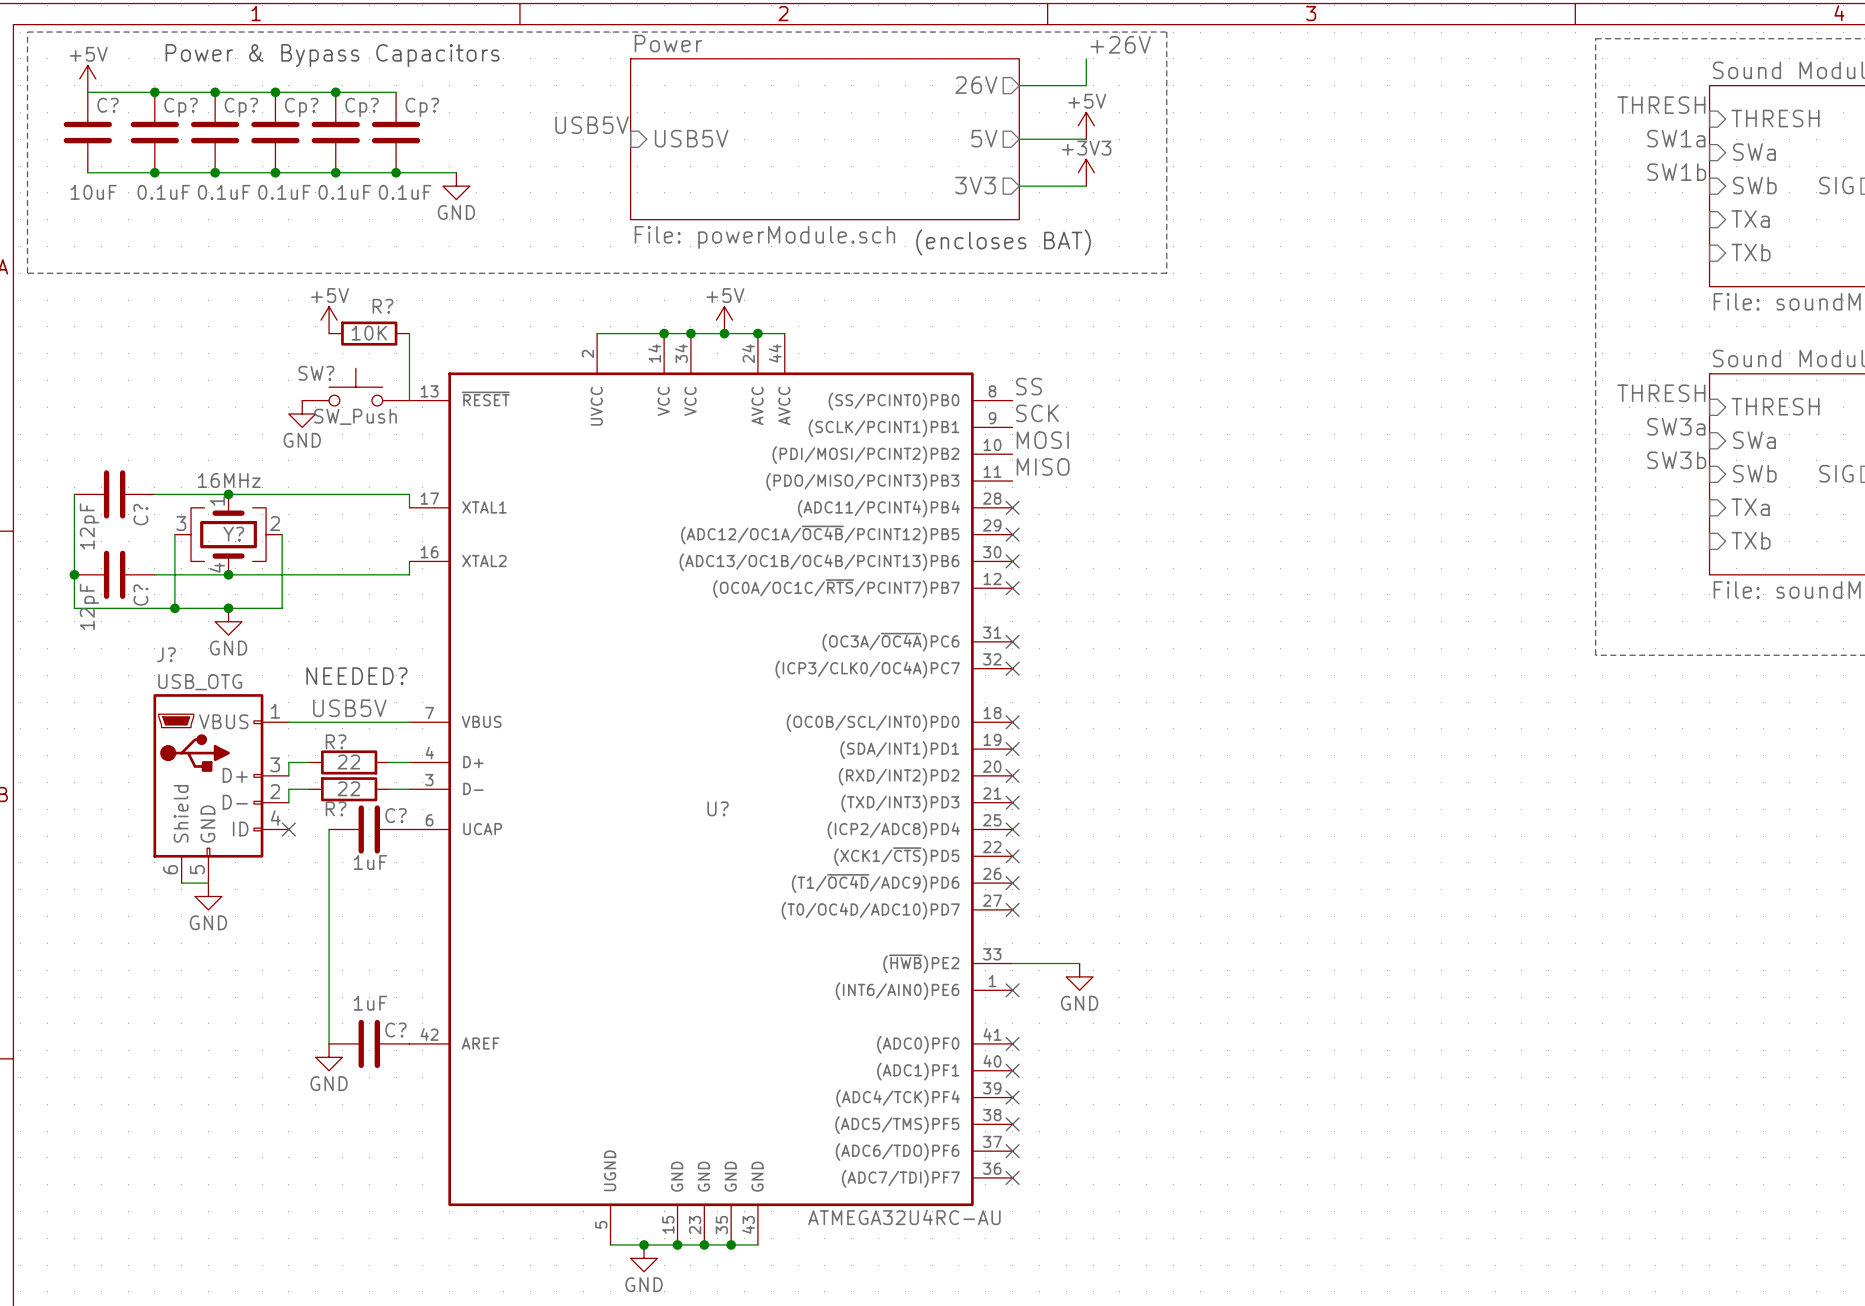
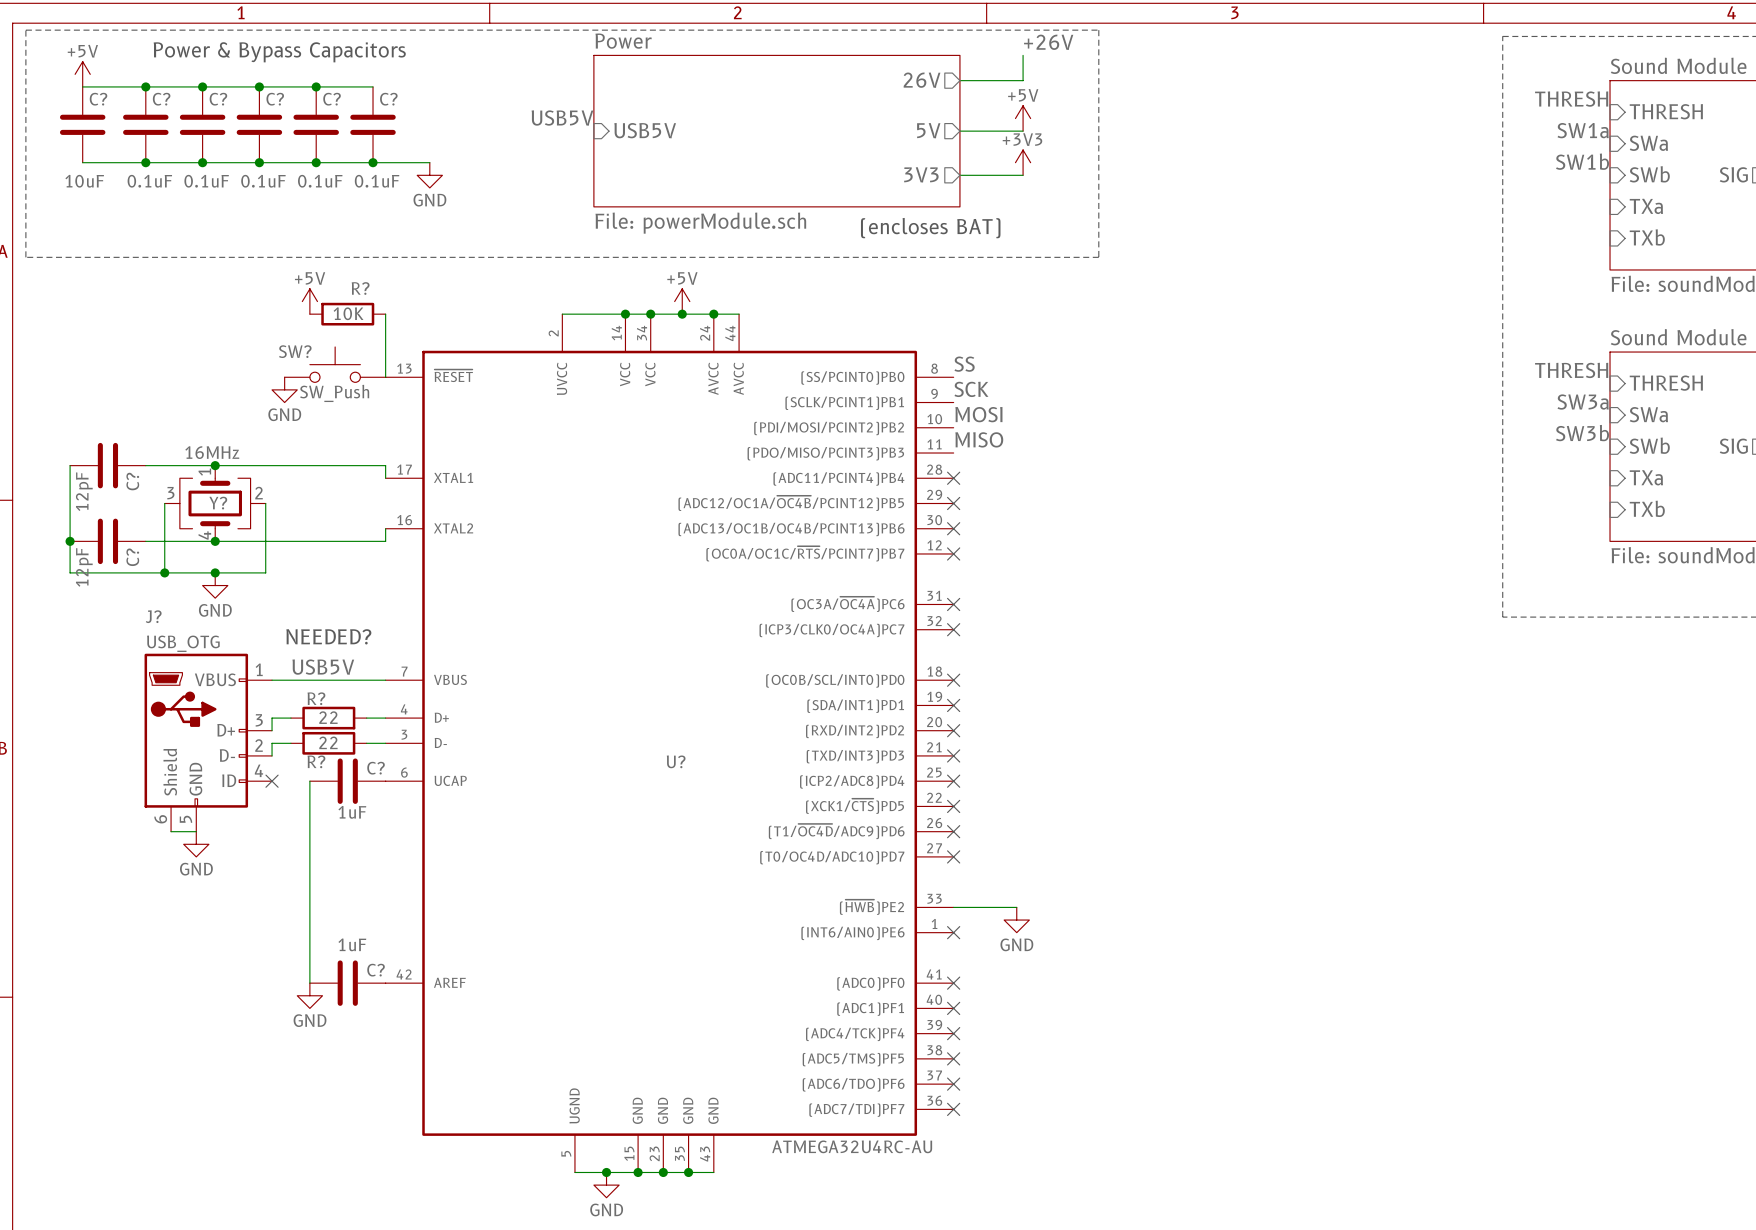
Cp? name: Cp? (181, 107) -> C? (161, 99)
Cp? name: Cp? (241, 107) -> C? (218, 99)
Cp? name: Cp? (301, 107) -> C? (275, 99)
Cp? name: Cp? (362, 107) -> C? (332, 99)
Cp? name: Cp? (422, 107) -> C? (388, 99)

